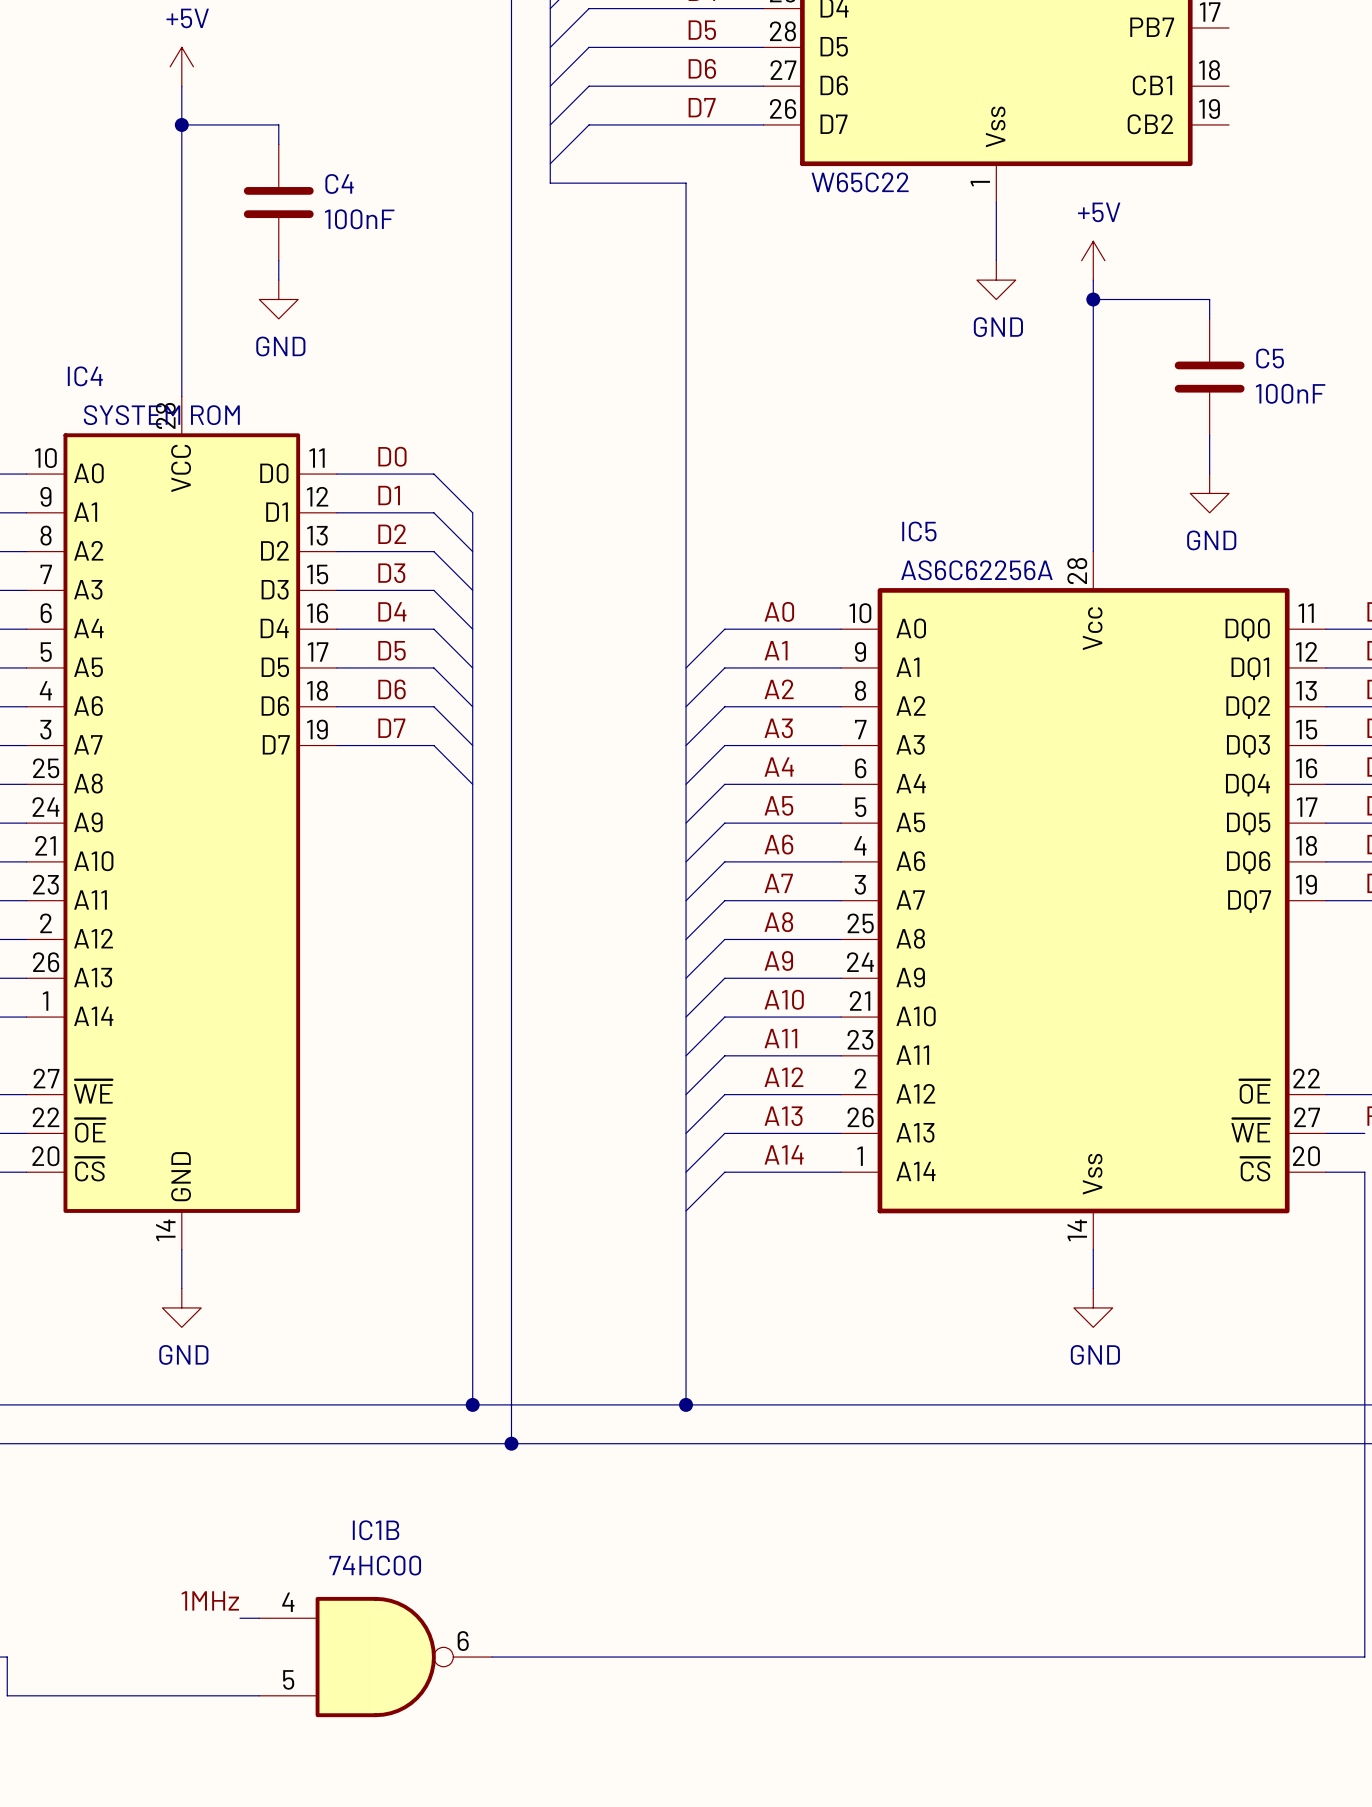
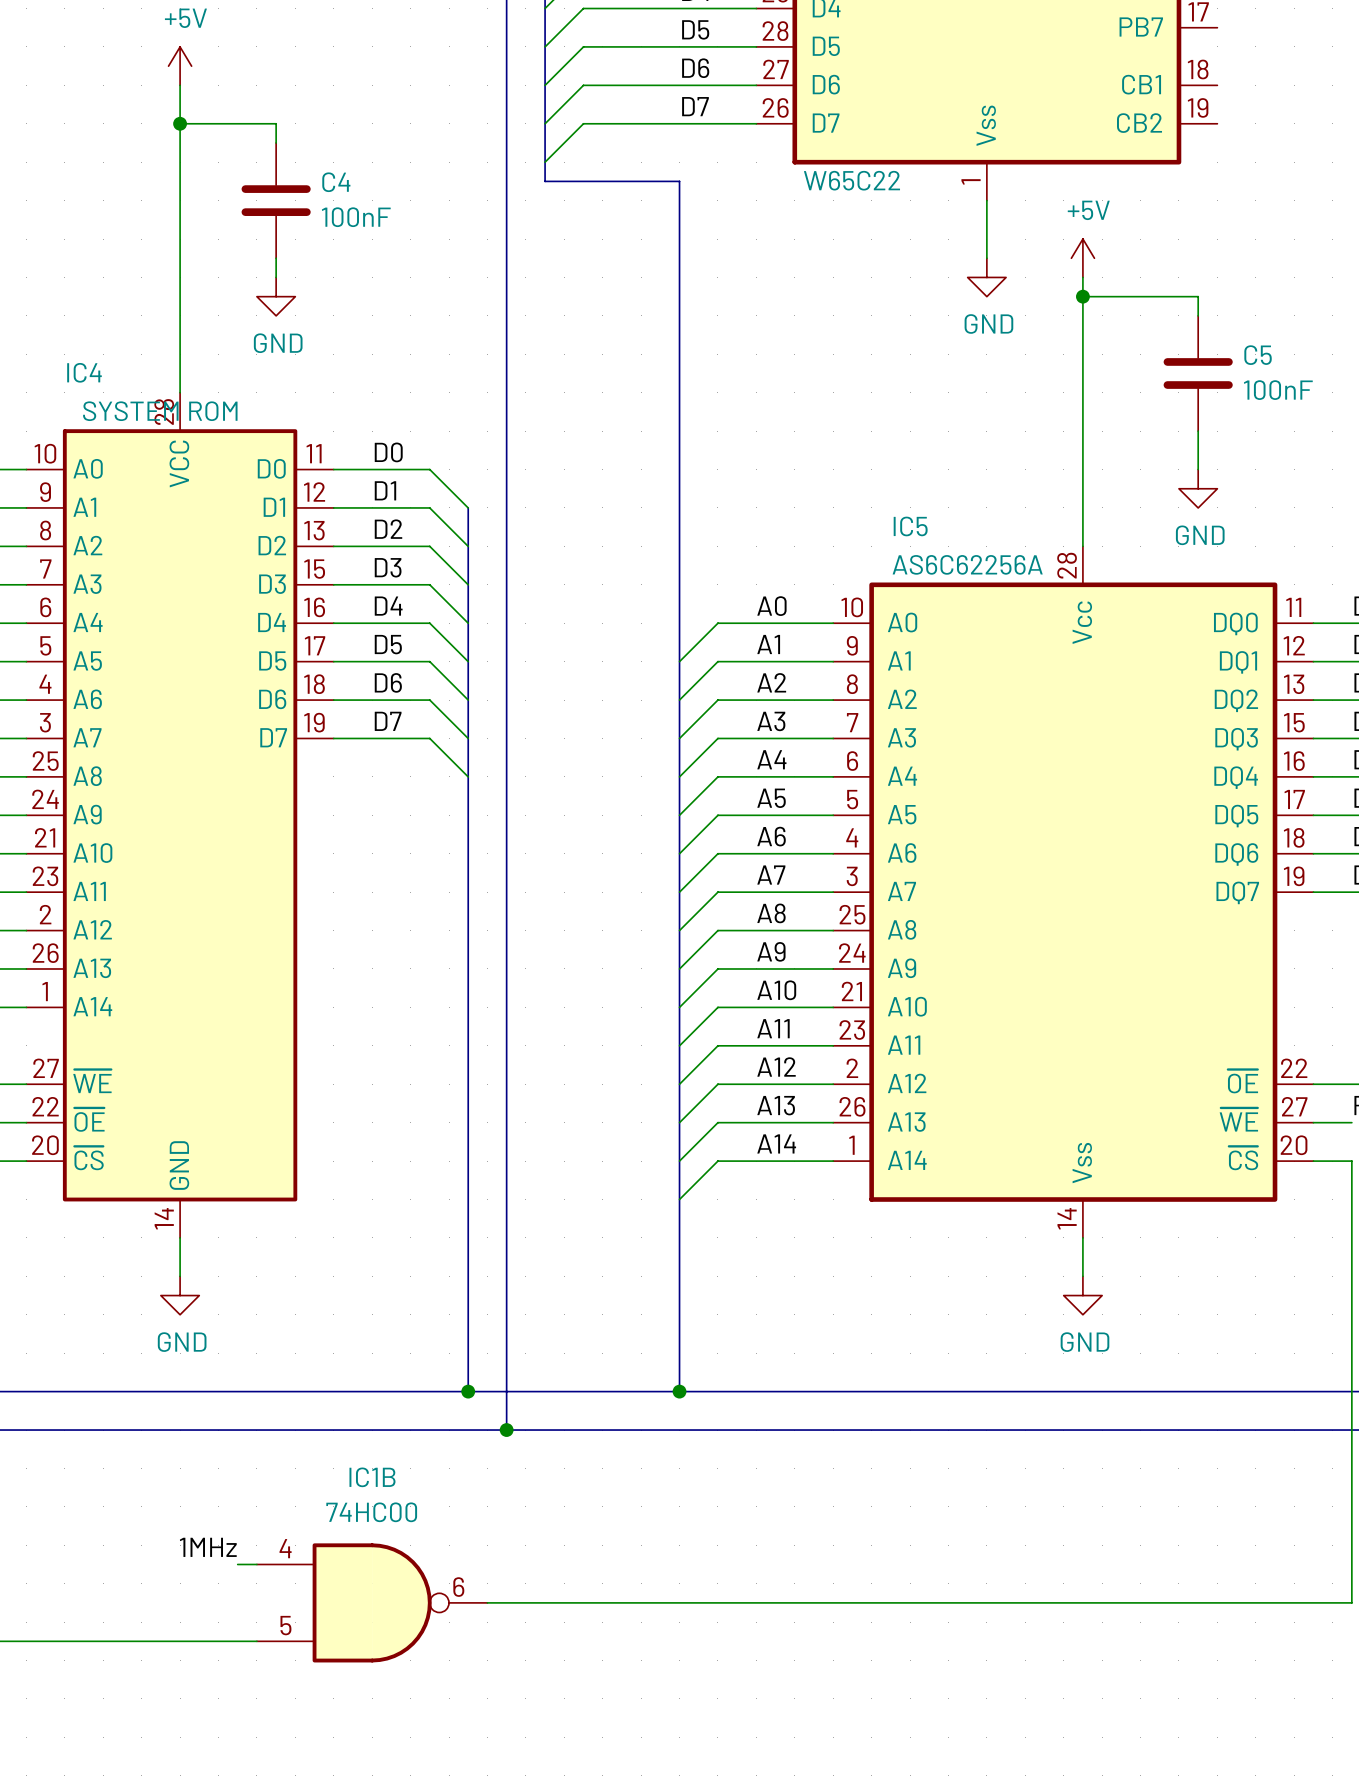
label position: 1MHz (210, 1600) -> 1MHz (208, 1547)
wire: (239, 1618) (259, 1618) -> (237, 1564) (256, 1564)
wire: (1364, 1618) (1364, 1657) (492, 1657) -> (1351, 1602) (487, 1602)
wire: (7, 1657) (7, 1695) (259, 1695) -> (7, 1641) (256, 1641)
IC1B position: (375, 1657) -> (372, 1602)

